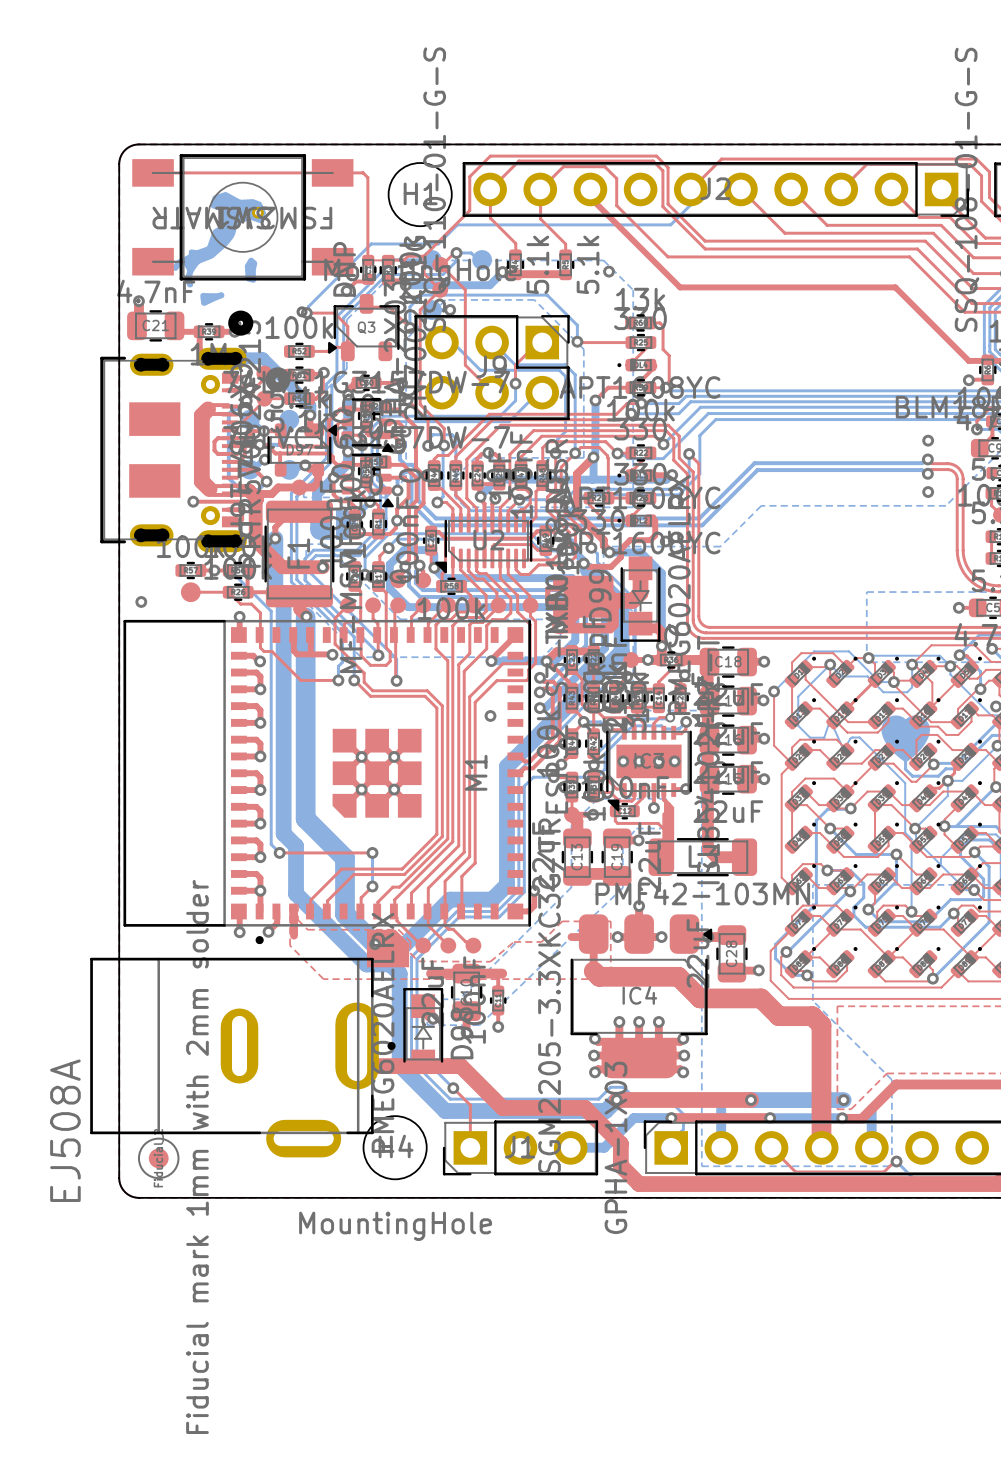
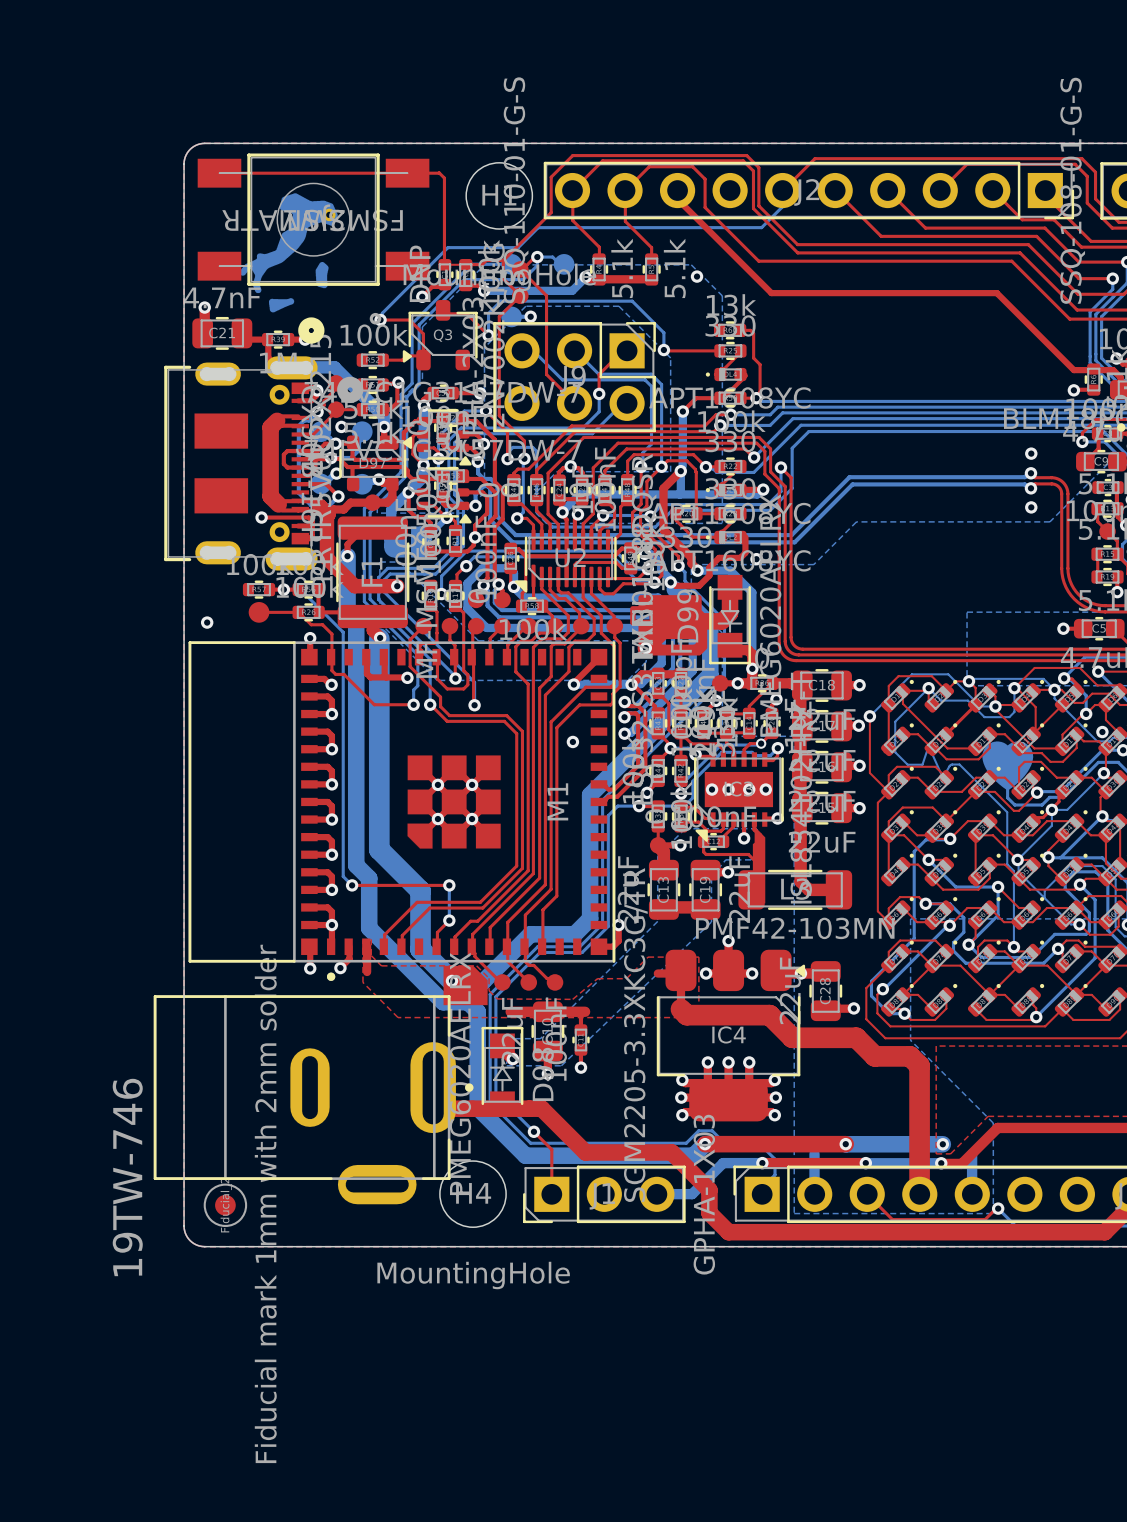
part value: EJ508A (65, 1130) -> 19TW-746 (127, 1177)

